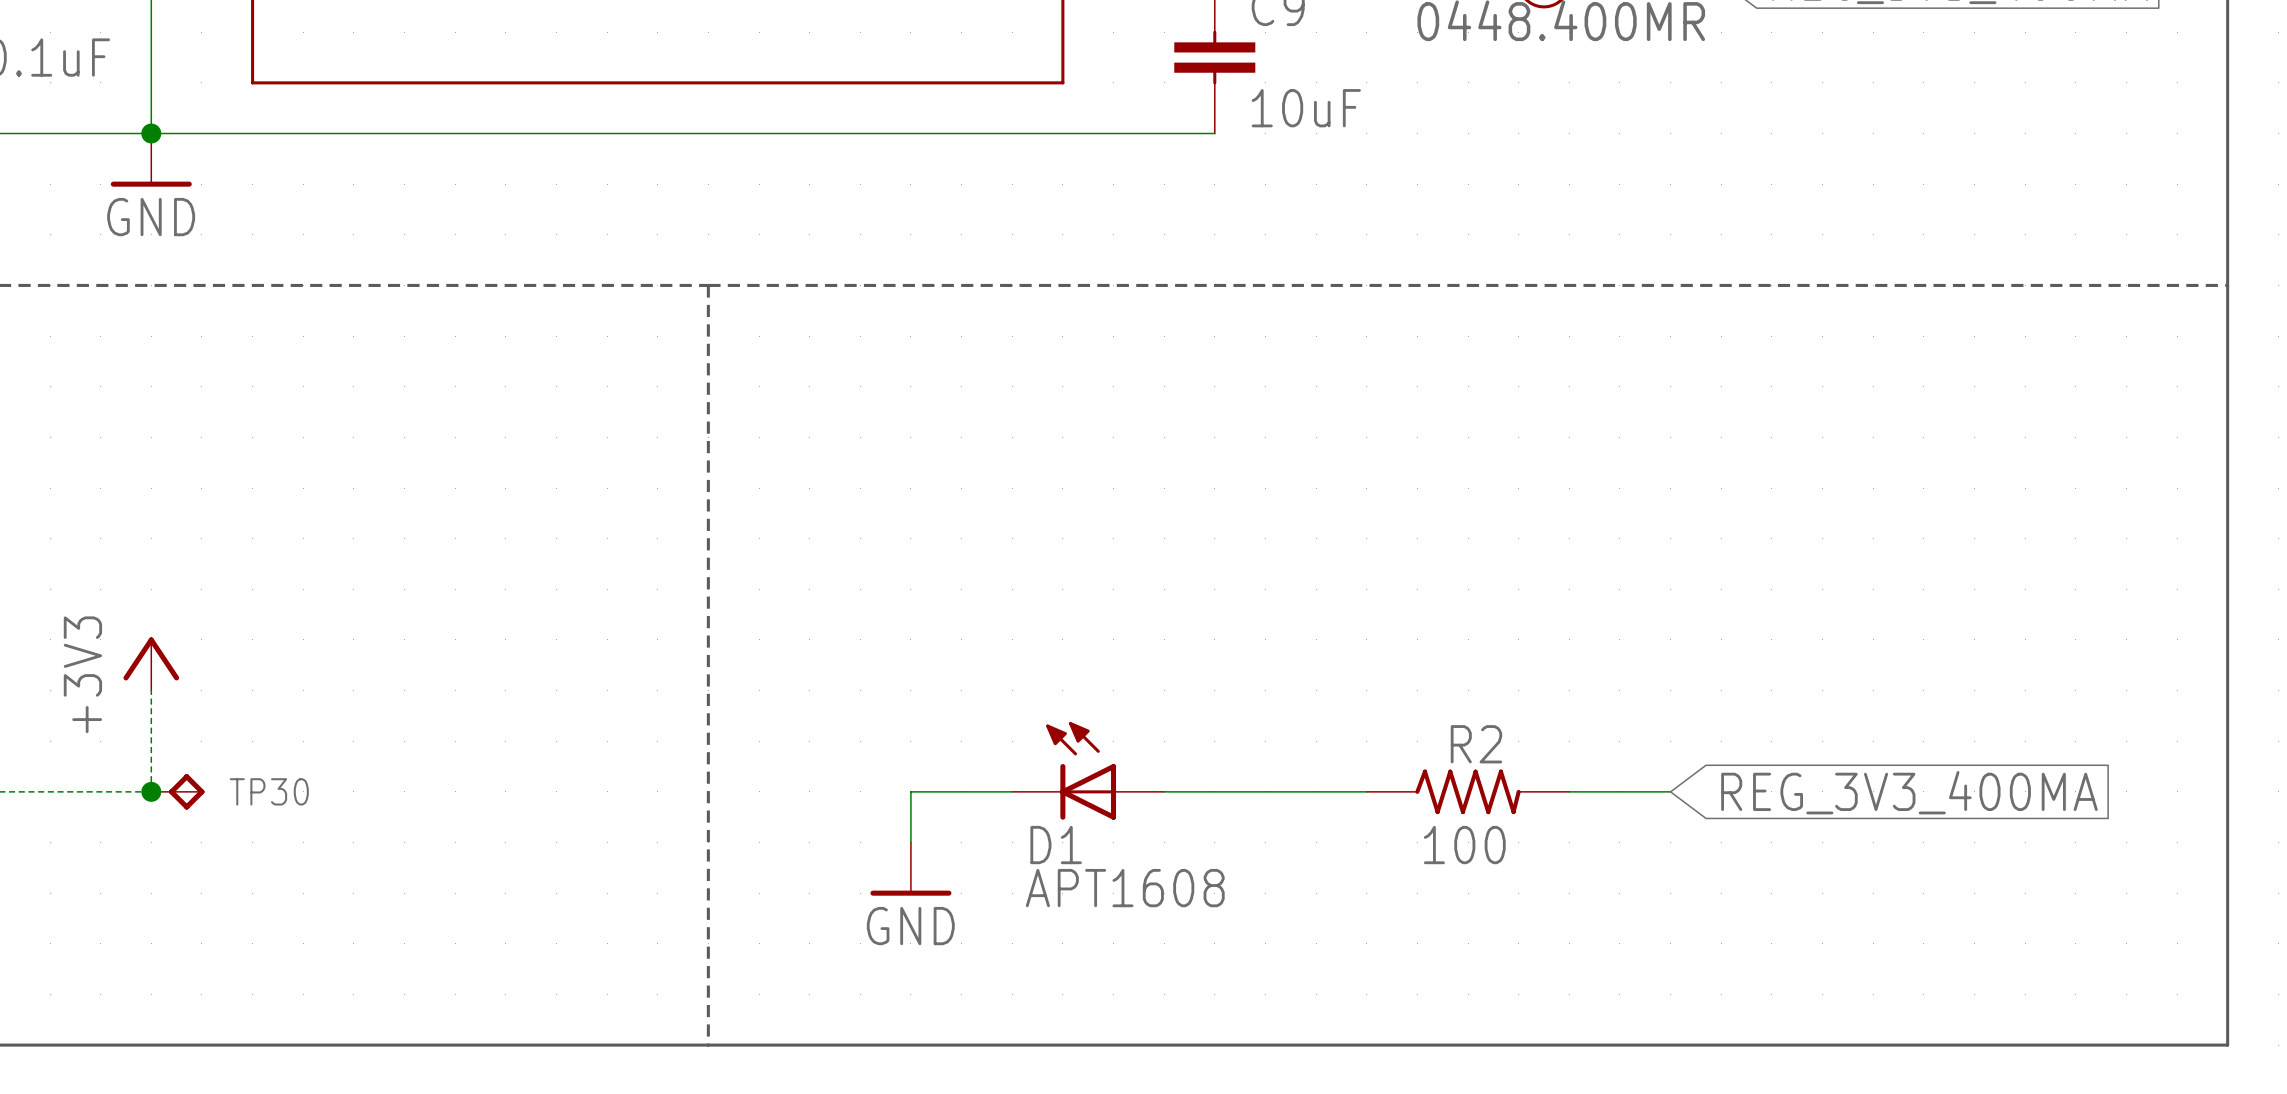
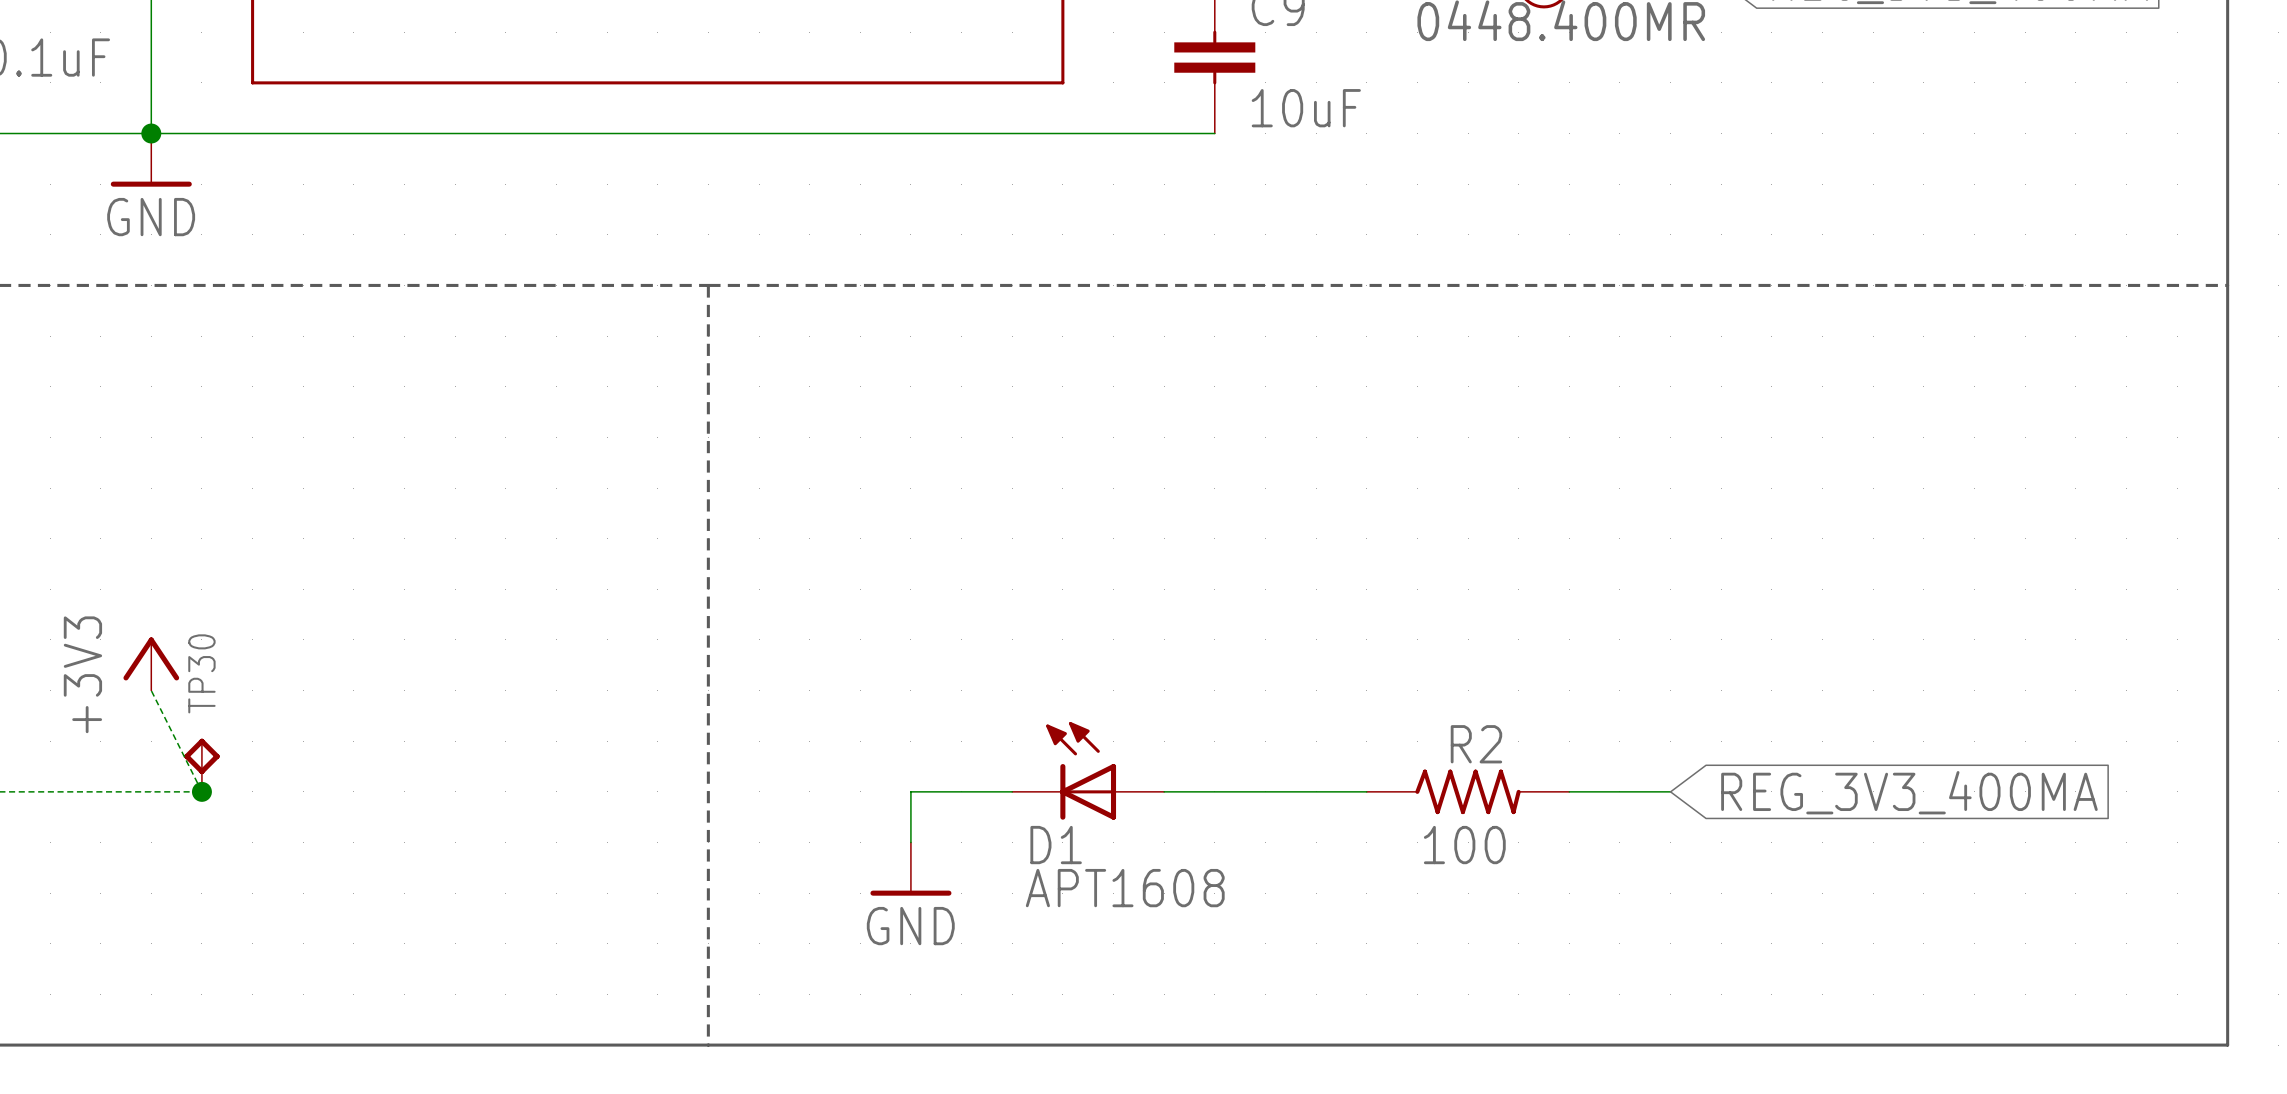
wire: (151, 690) (151, 791) -> (151, 690) (201, 791) (151, 791)
junction position: (151, 791) -> (201, 791)
TP30 position: (177, 791) -> (201, 765)
TP30 rotation: 0° (186, 791) -> 90° counterclockwise (201, 756)

